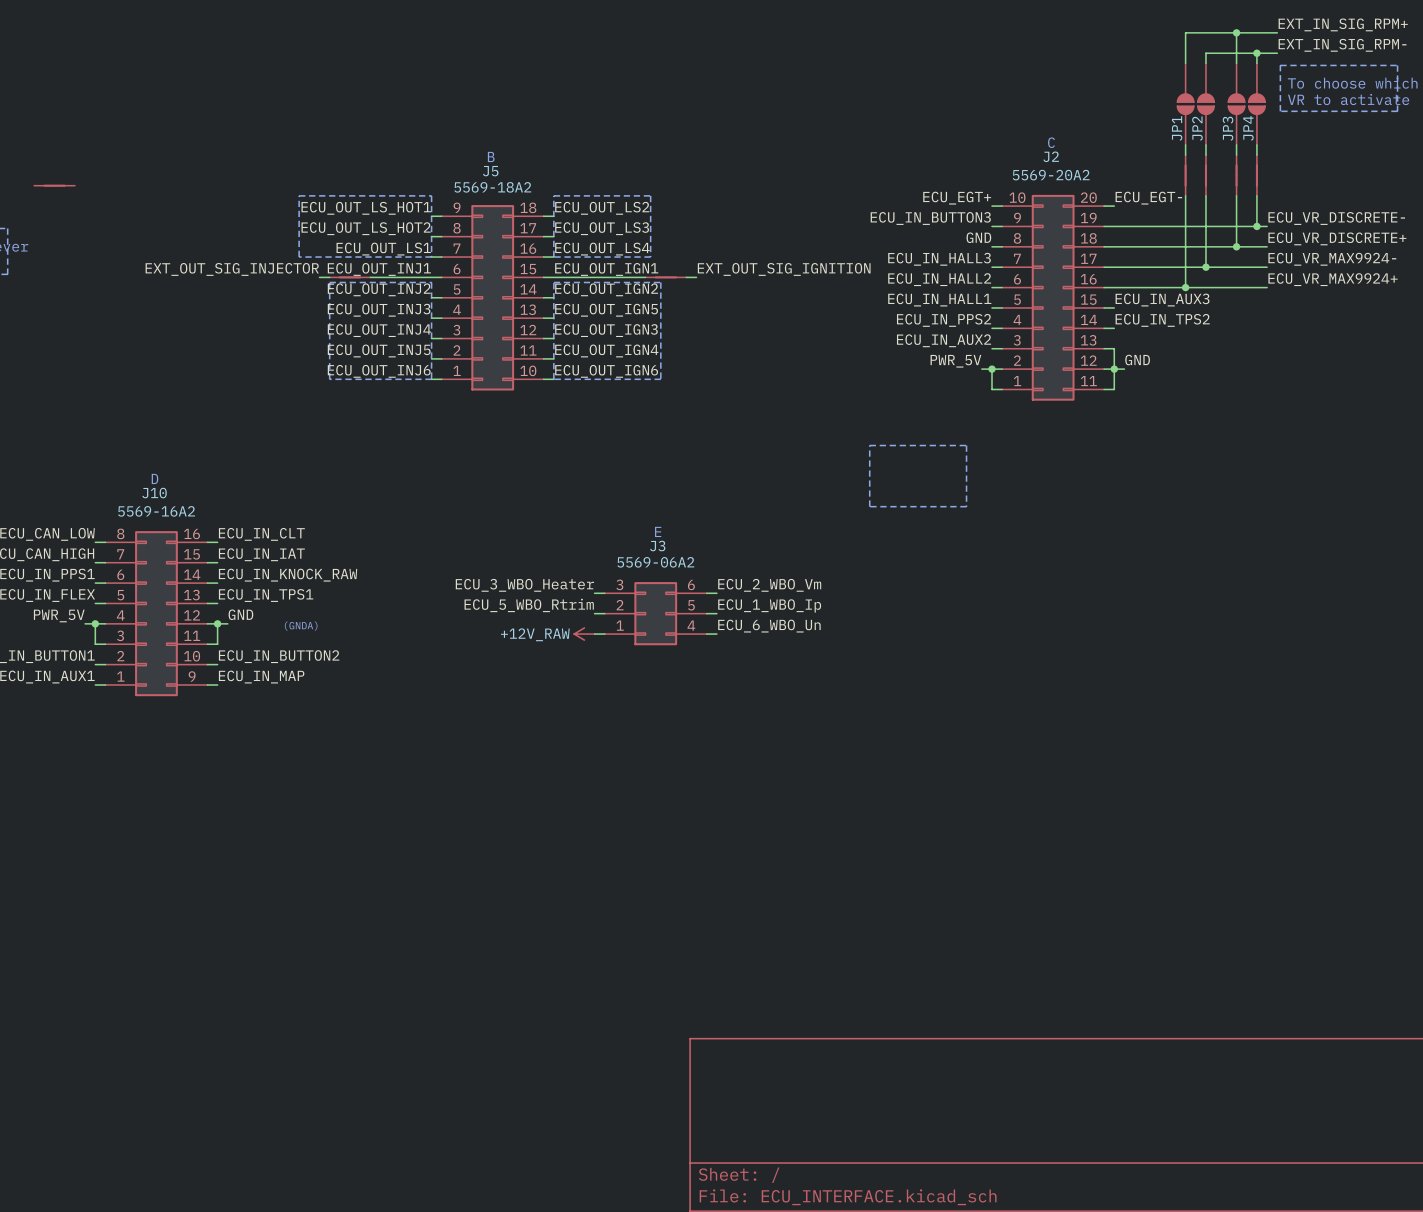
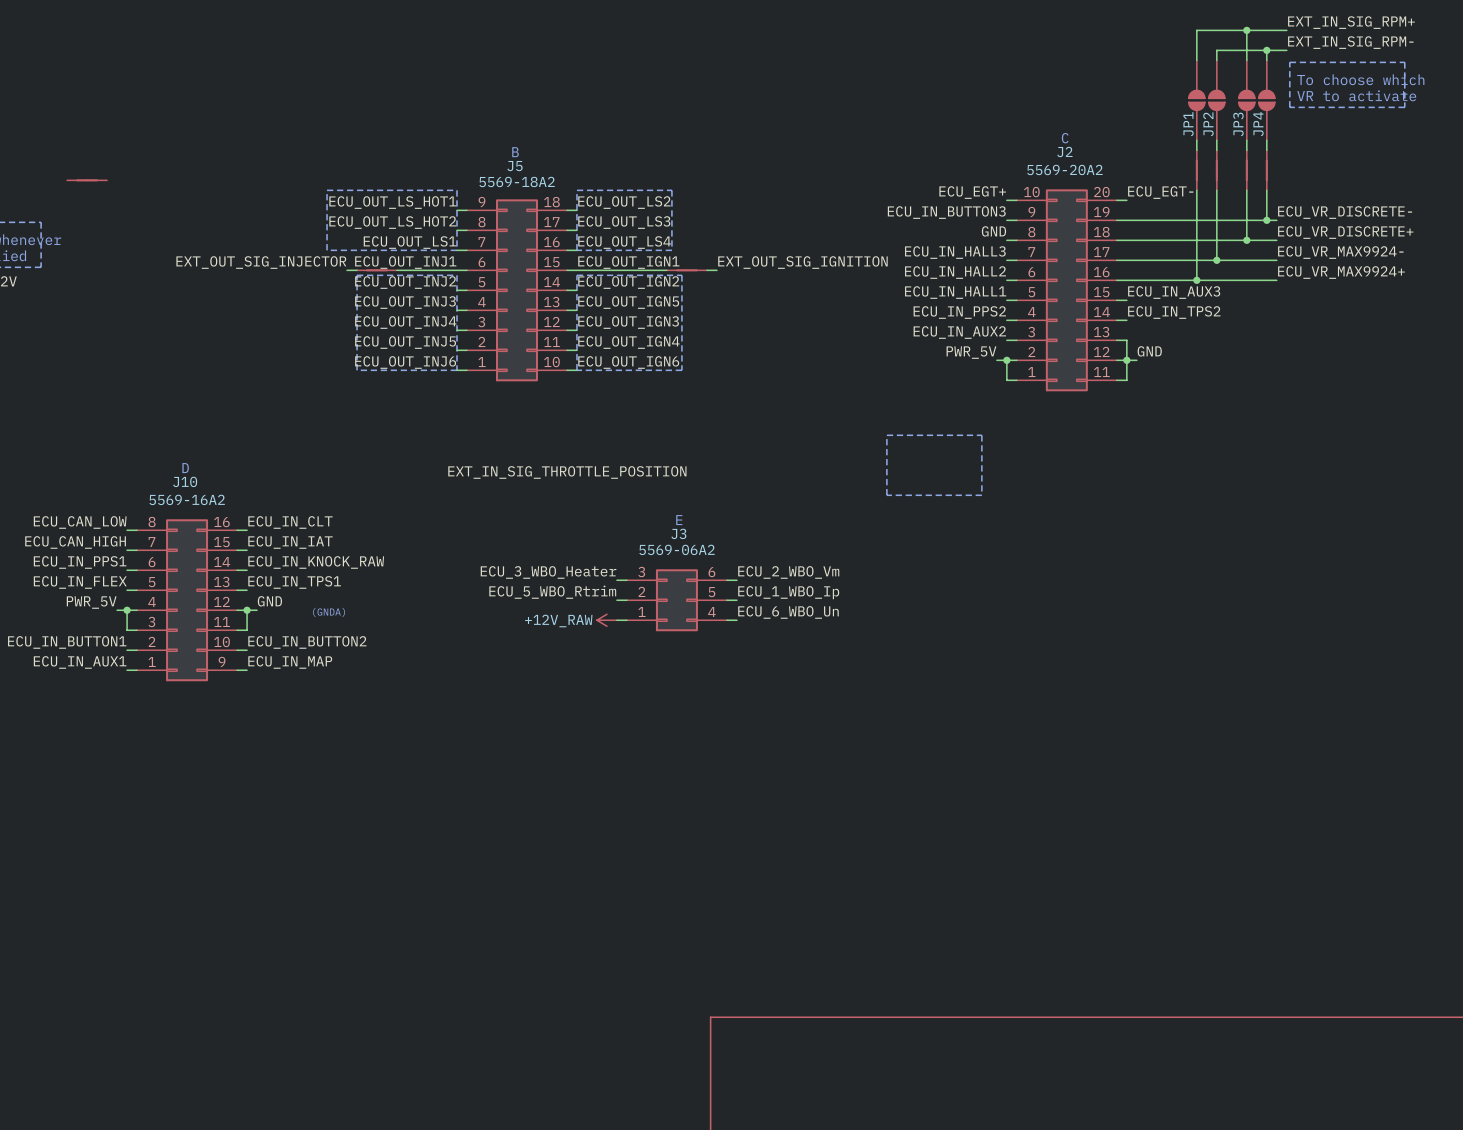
label: none -> EXT_IN_SIG_THROTTLE_POSITION (567, 472)

